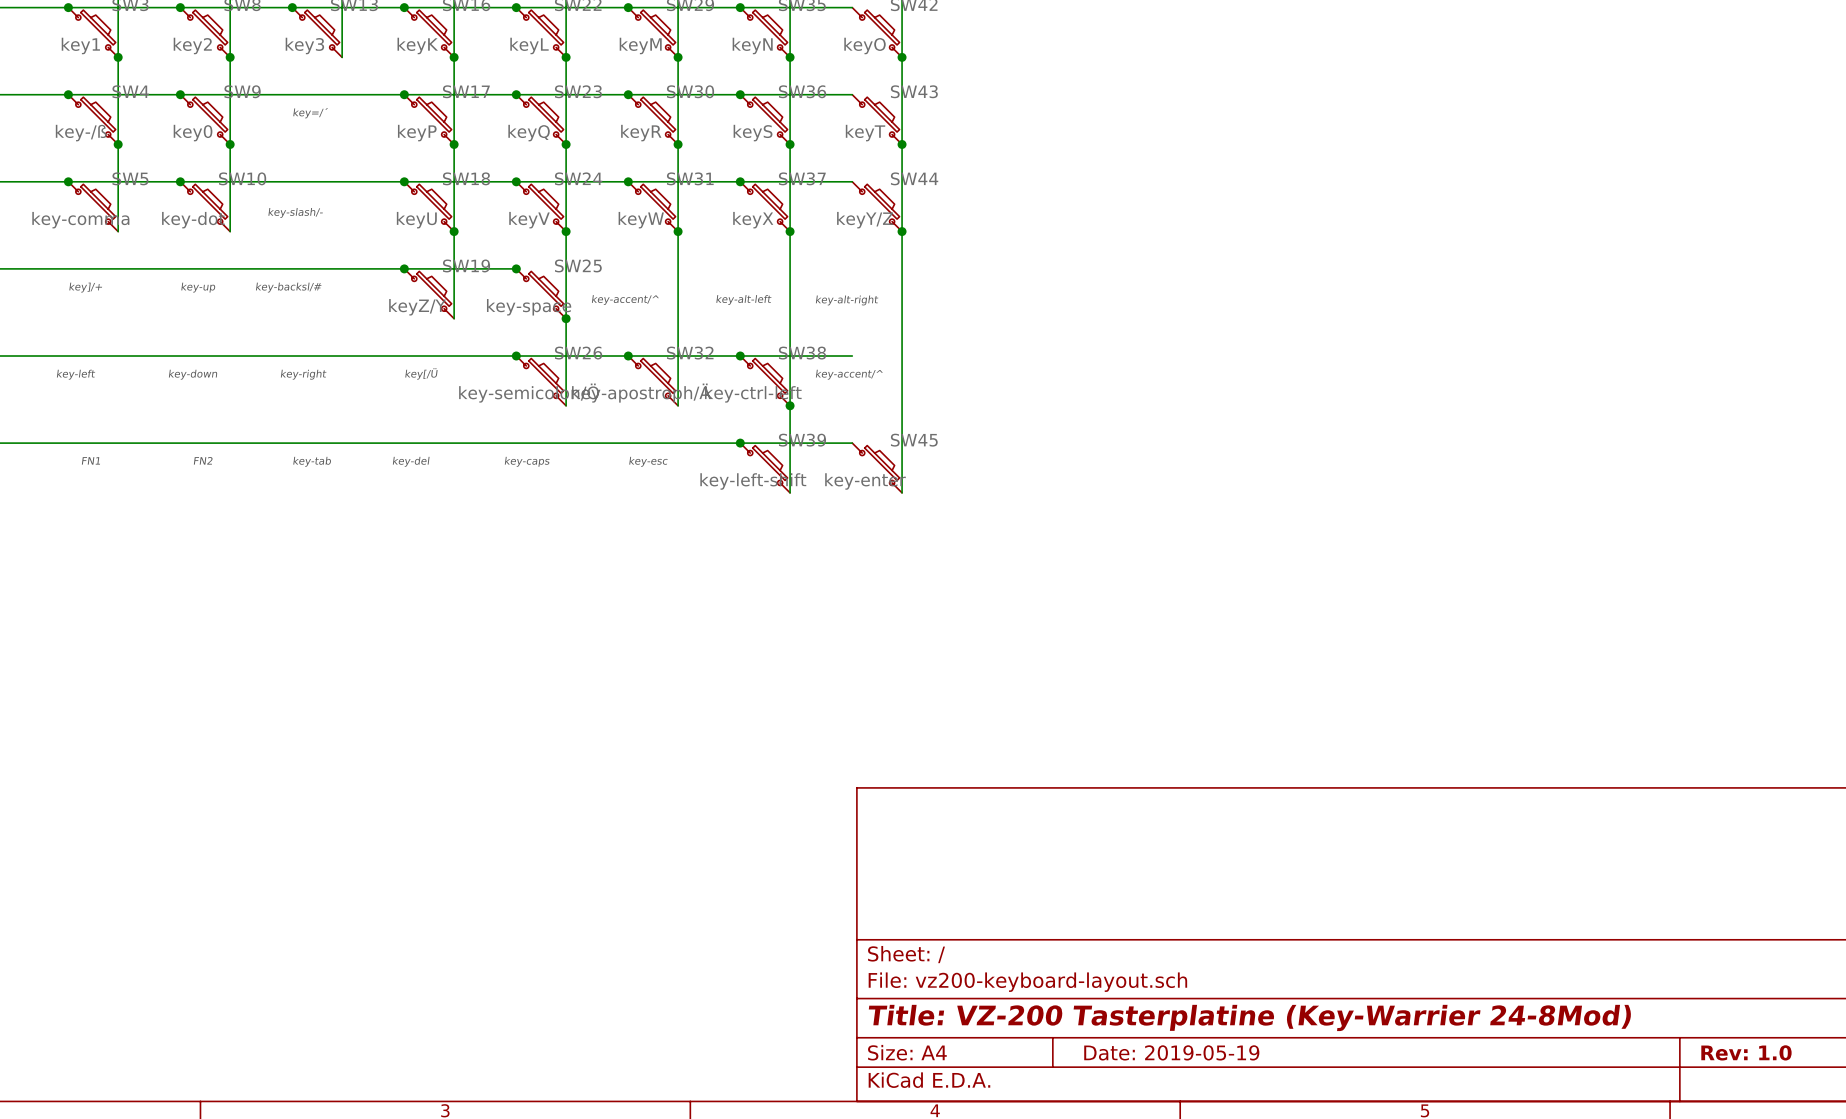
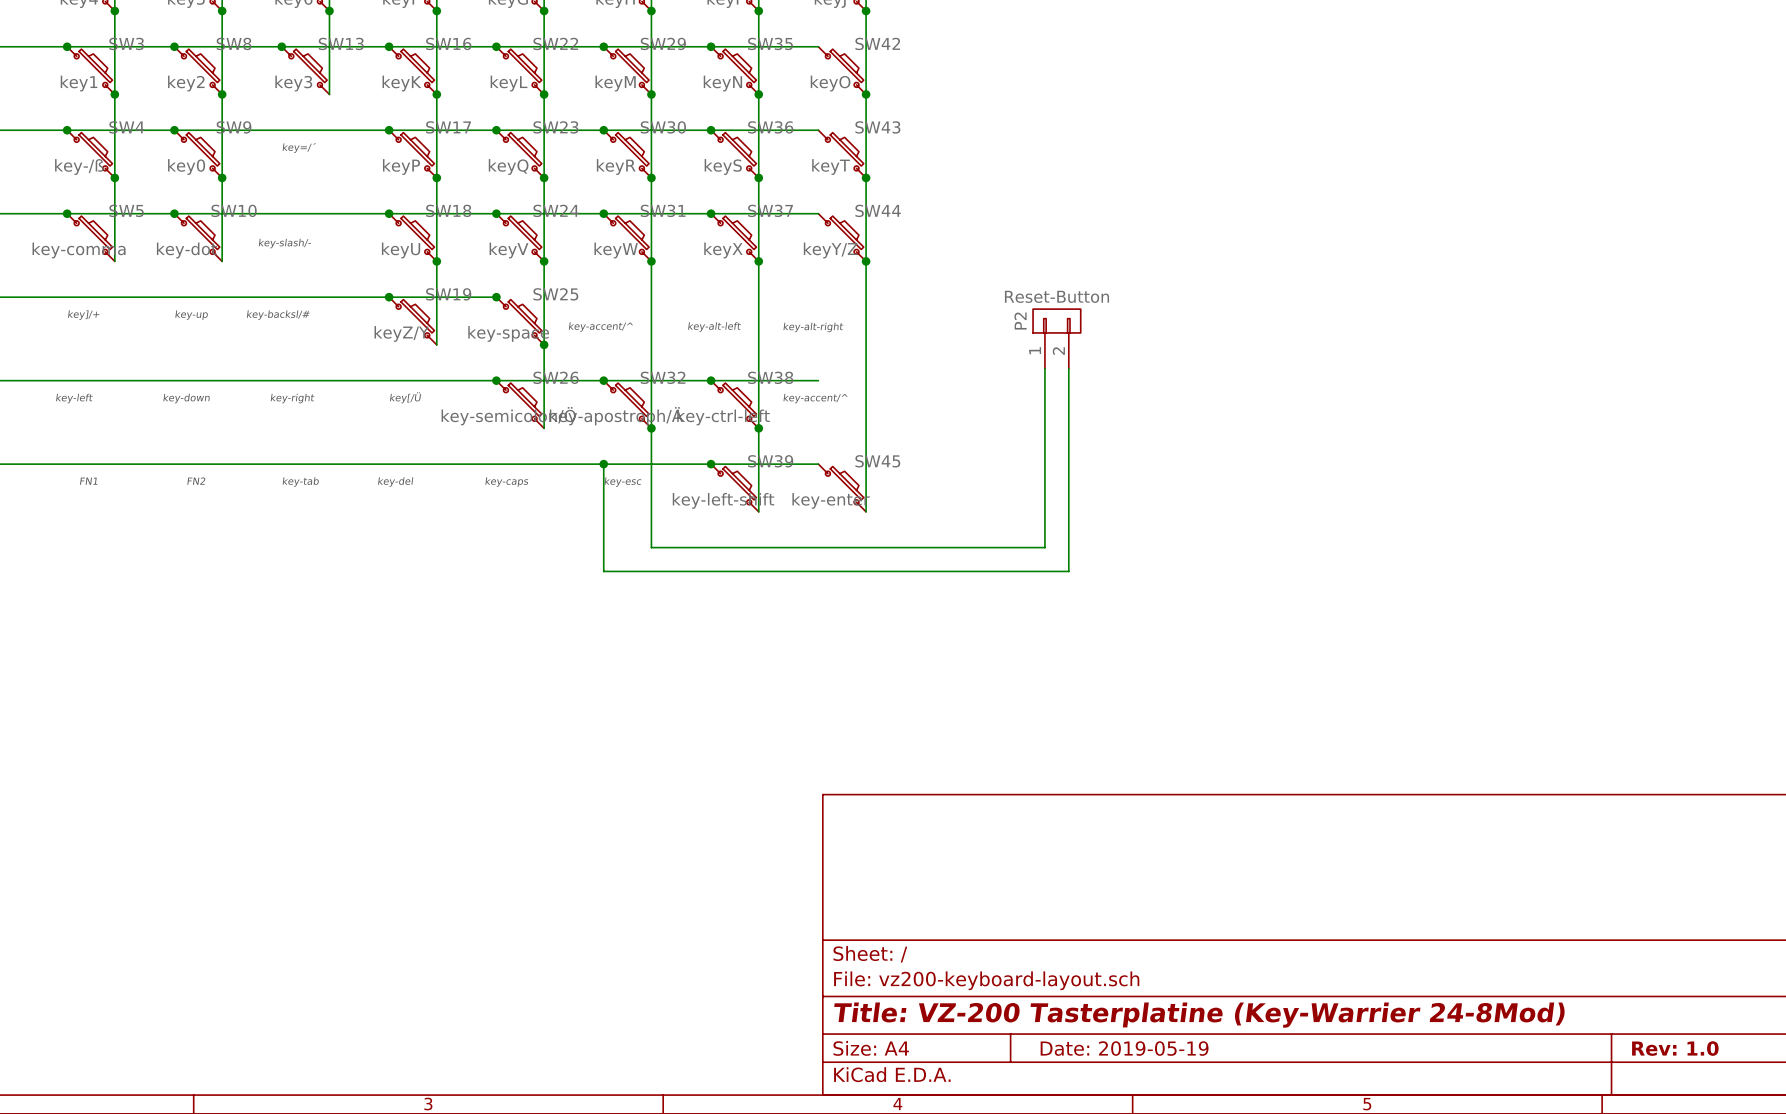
P2: none -> Reset-Button (1056, 338)
wire: none -> (1044, 368) (1044, 547) (651, 547) (651, 428)
wire: none -> (1068, 368) (1068, 571) (603, 571) (603, 464)
junction: none -> (651, 428)
junction: none -> (603, 464)

